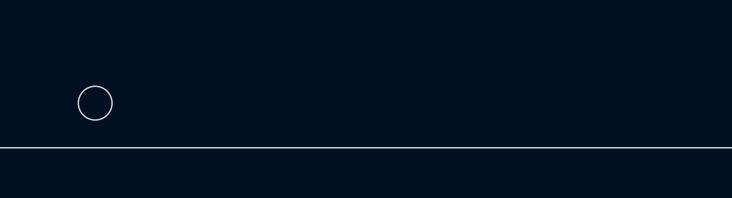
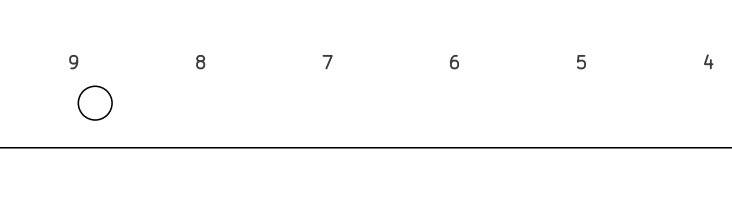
text: none -> 4 (708, 61)
text: none -> 9 (73, 62)
text: none -> 8 (200, 62)
text: none -> 7 (327, 62)
text: none -> 6 (454, 62)
text: none -> 5 (581, 62)

